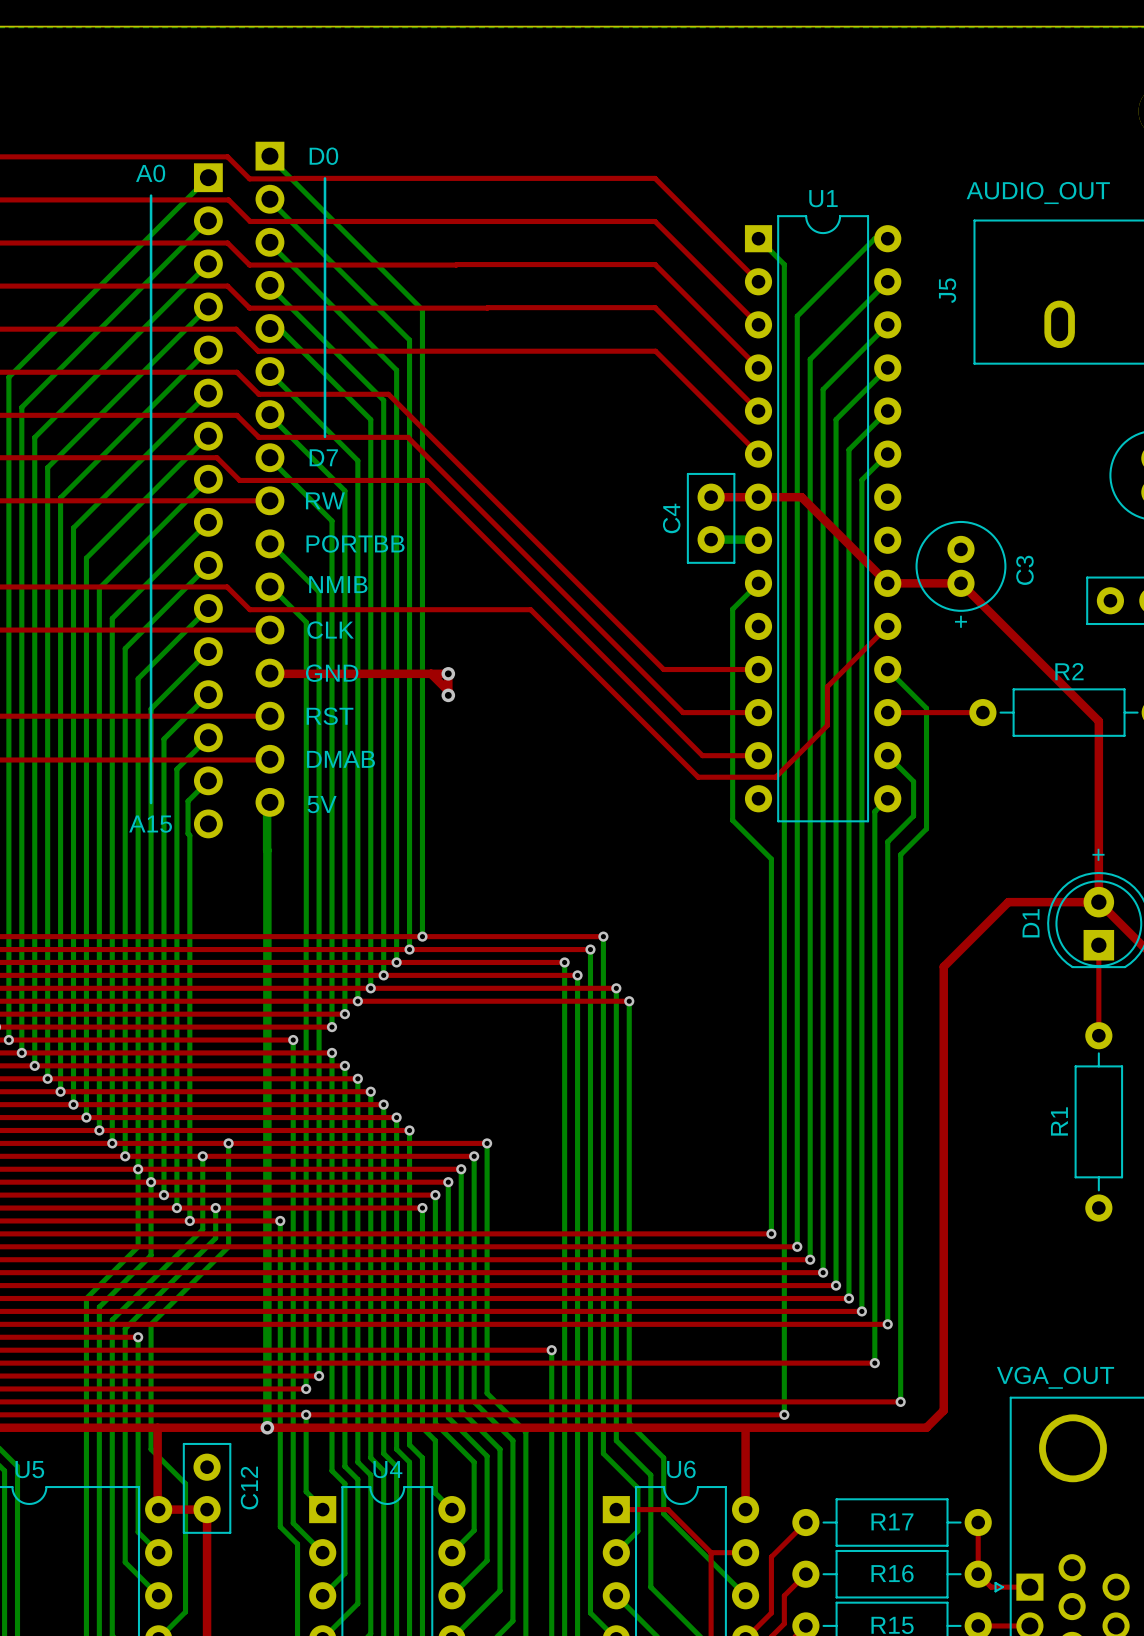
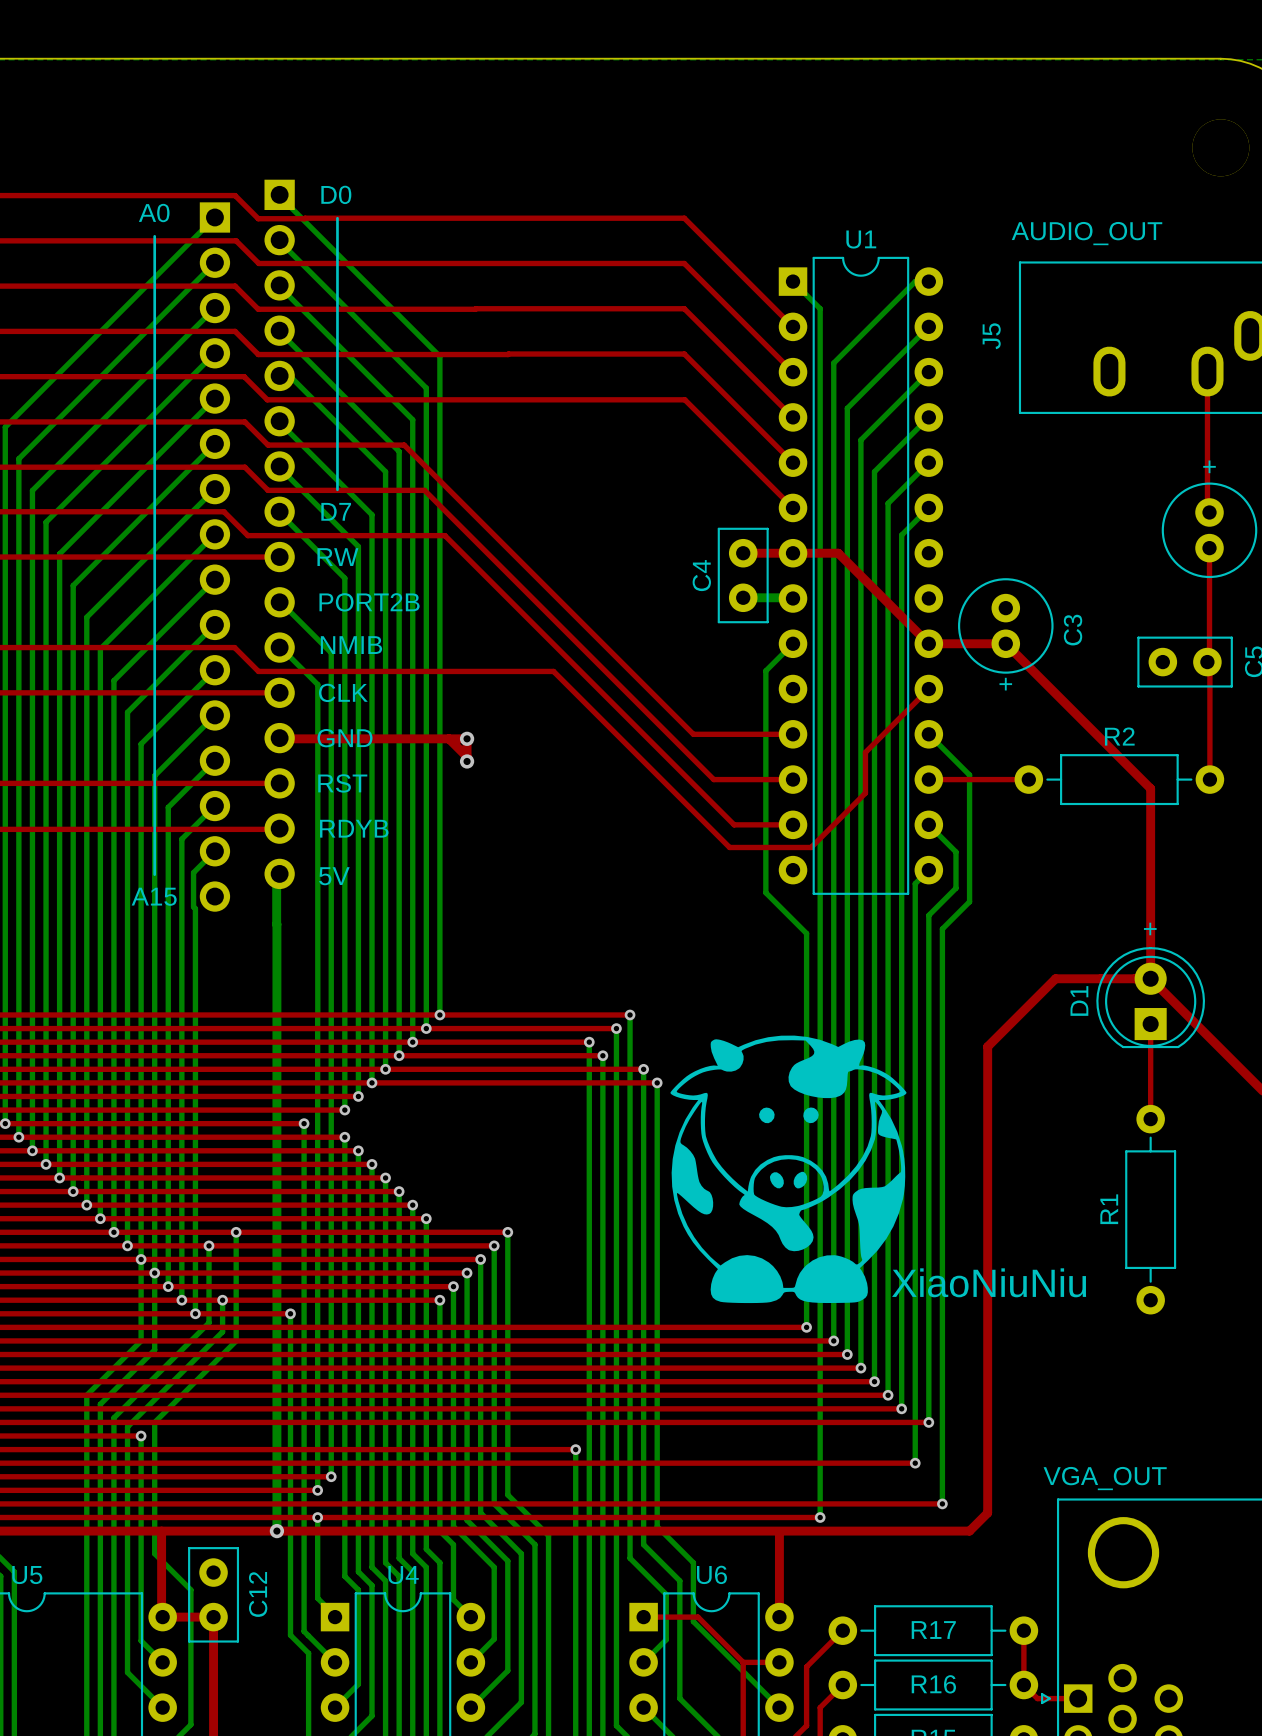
text: PORTBB (355, 543) -> PORT2B (369, 602)
text: DMAB (340, 759) -> RDYB (354, 828)
XiaoNiuNiu: none -> (788, 1169)

